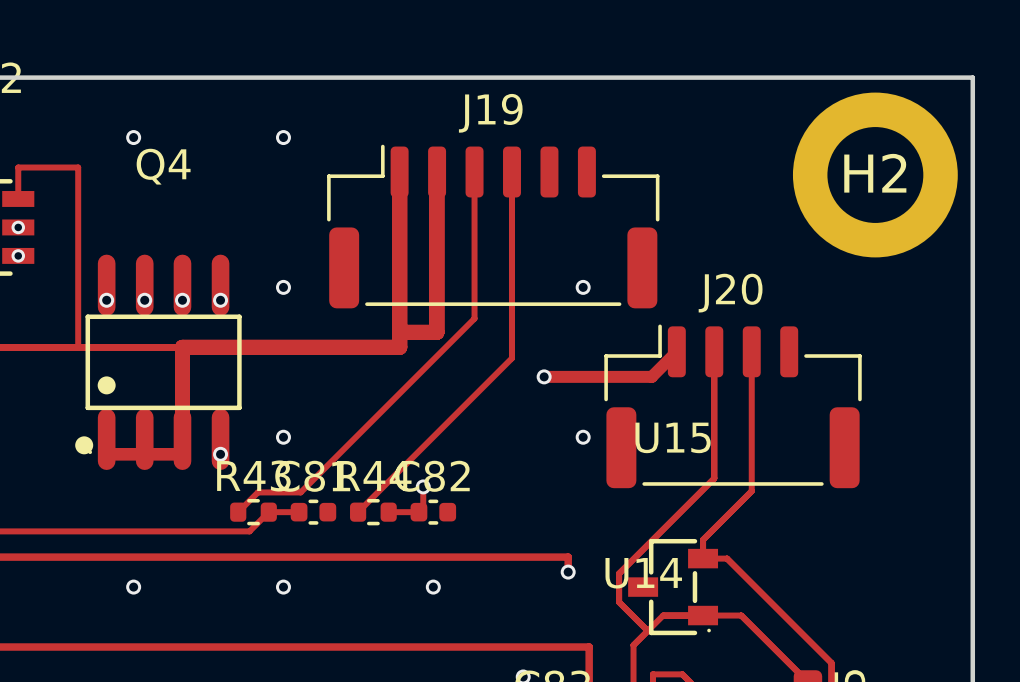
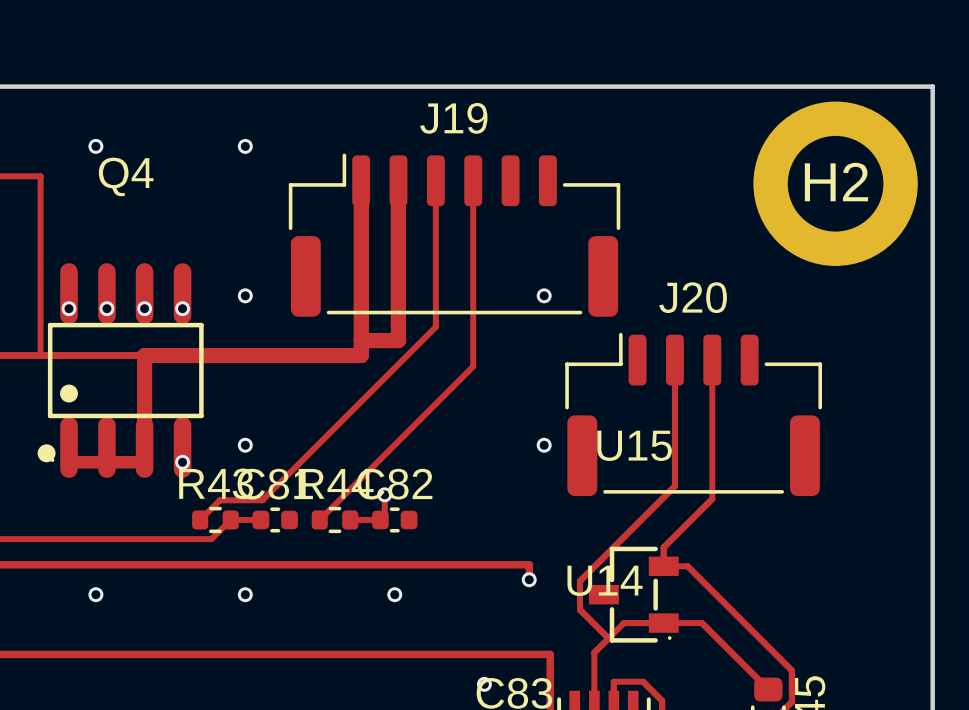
track: (676, 351) (651, 376) (544, 376) -> none
via: (544, 376) -> none

